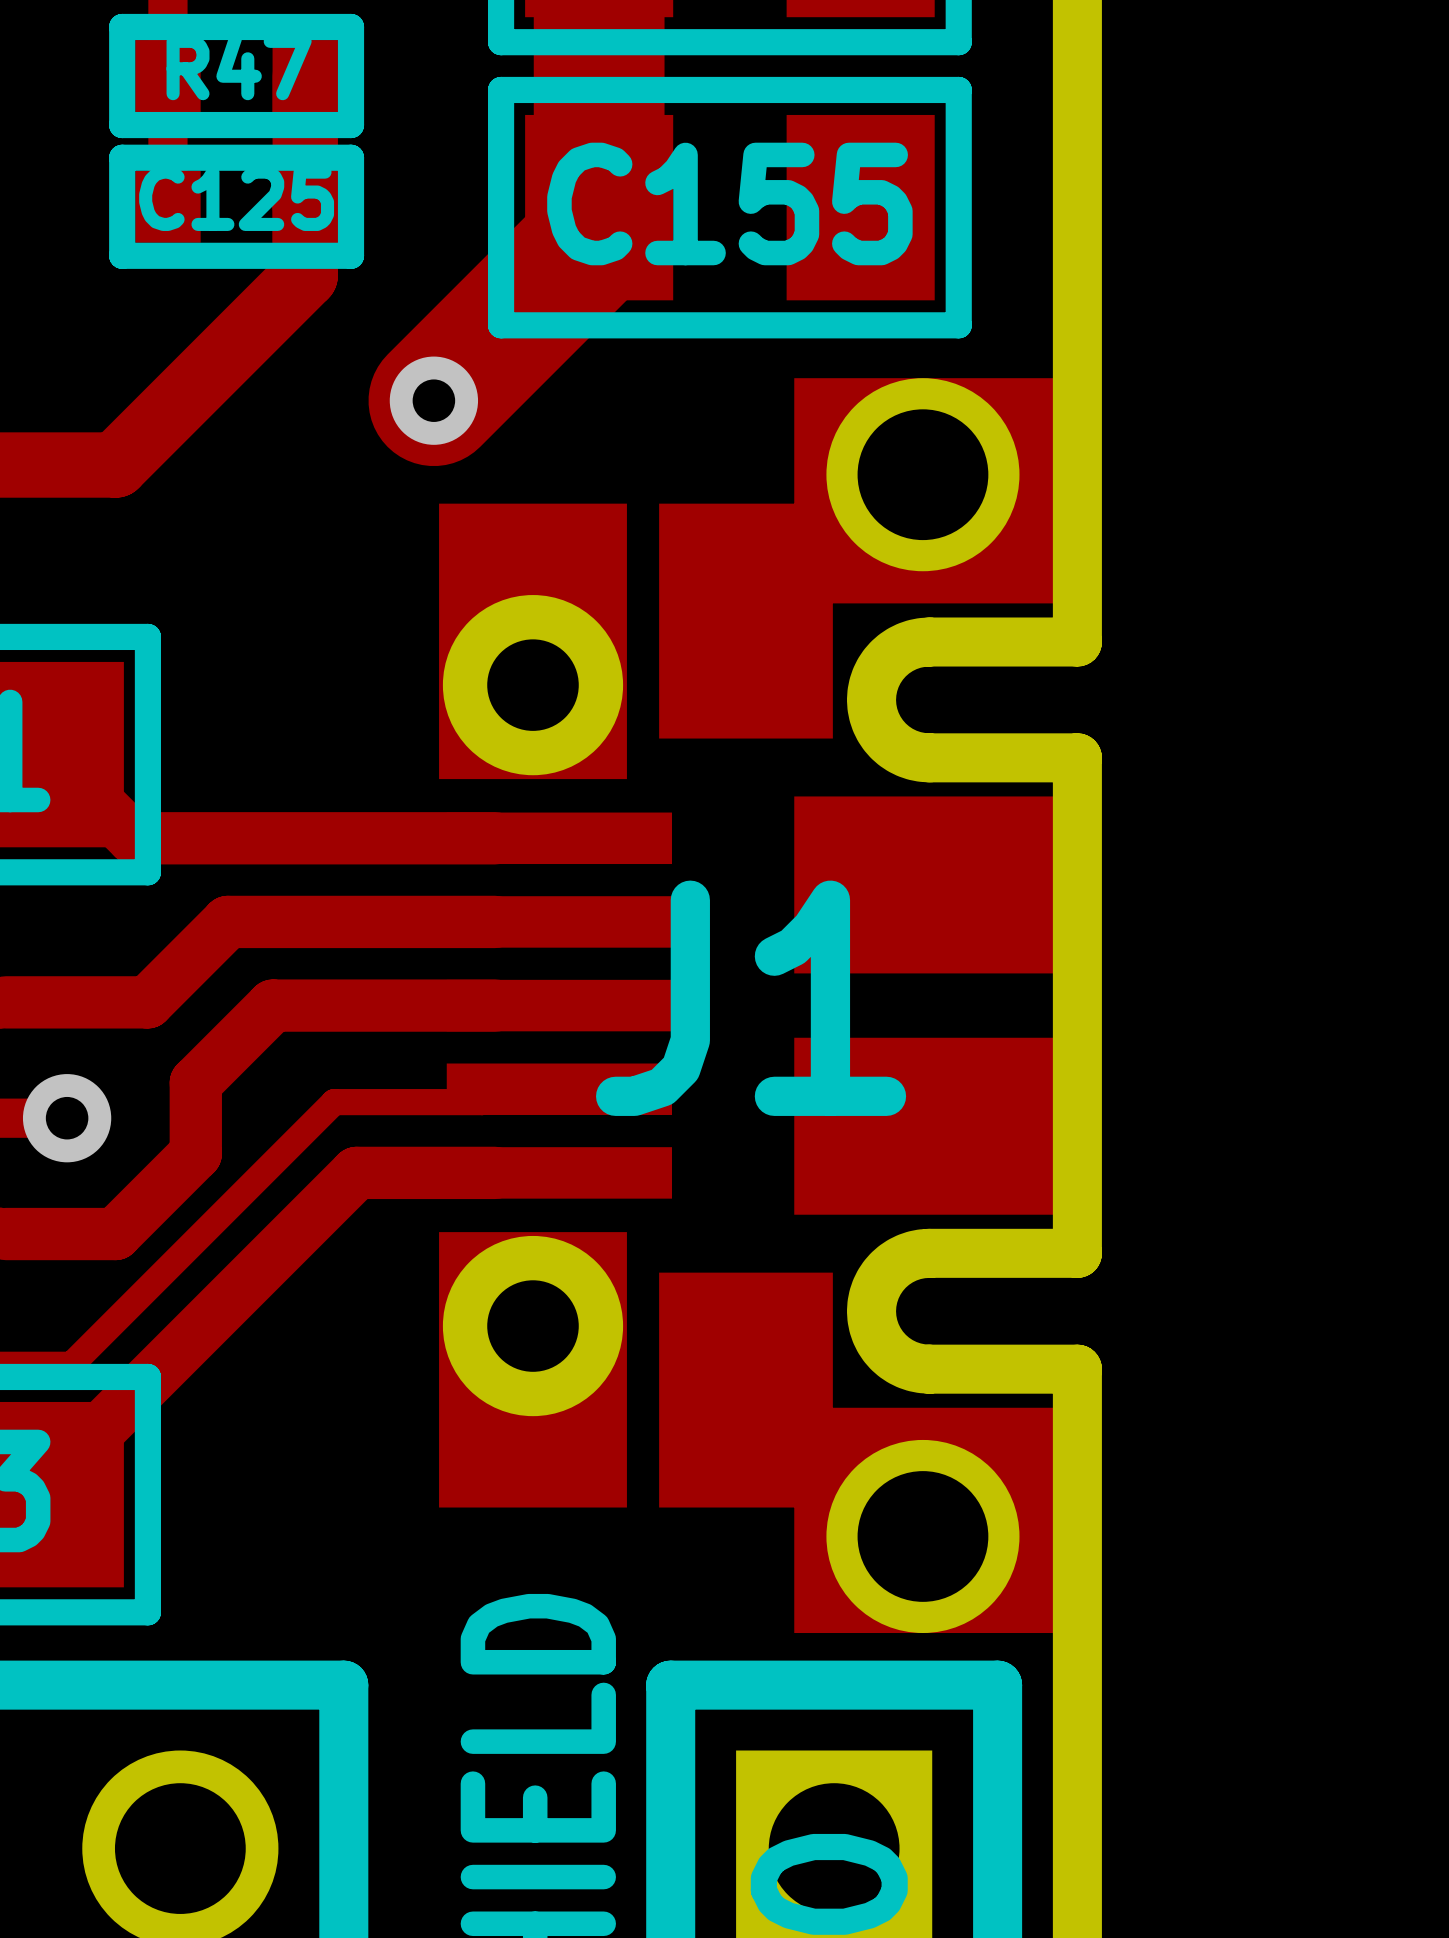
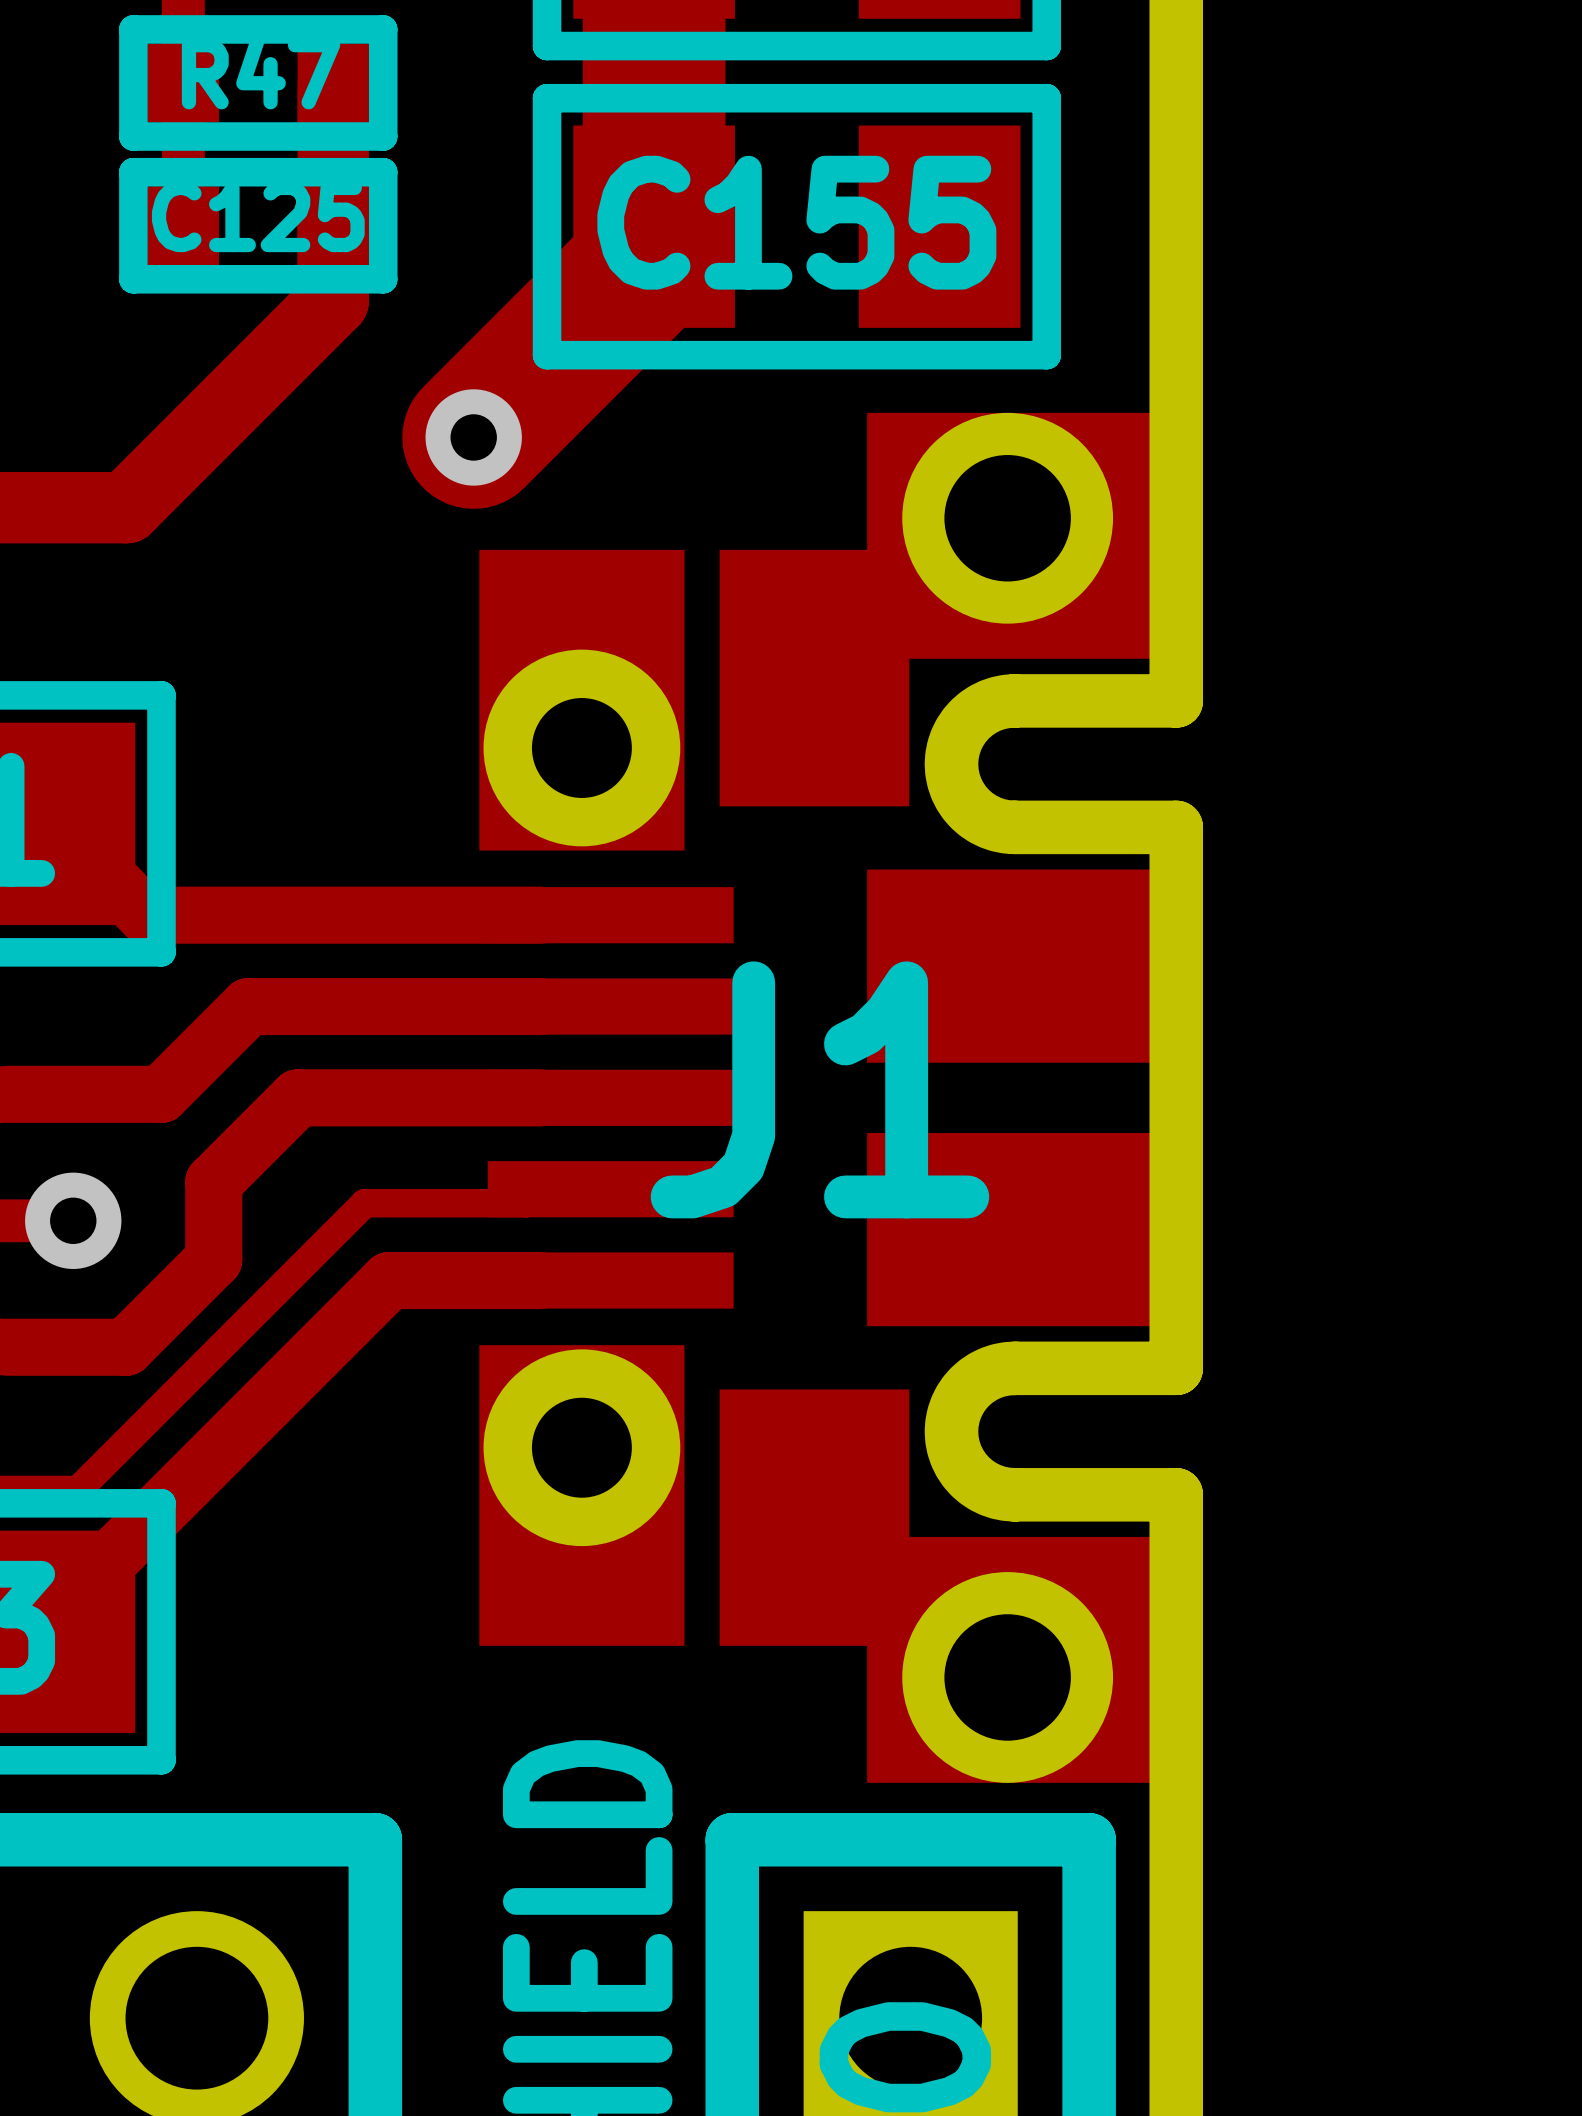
J1 footprint: [439, 378, 1065, 1634] -> [479, 412, 1163, 1783]

